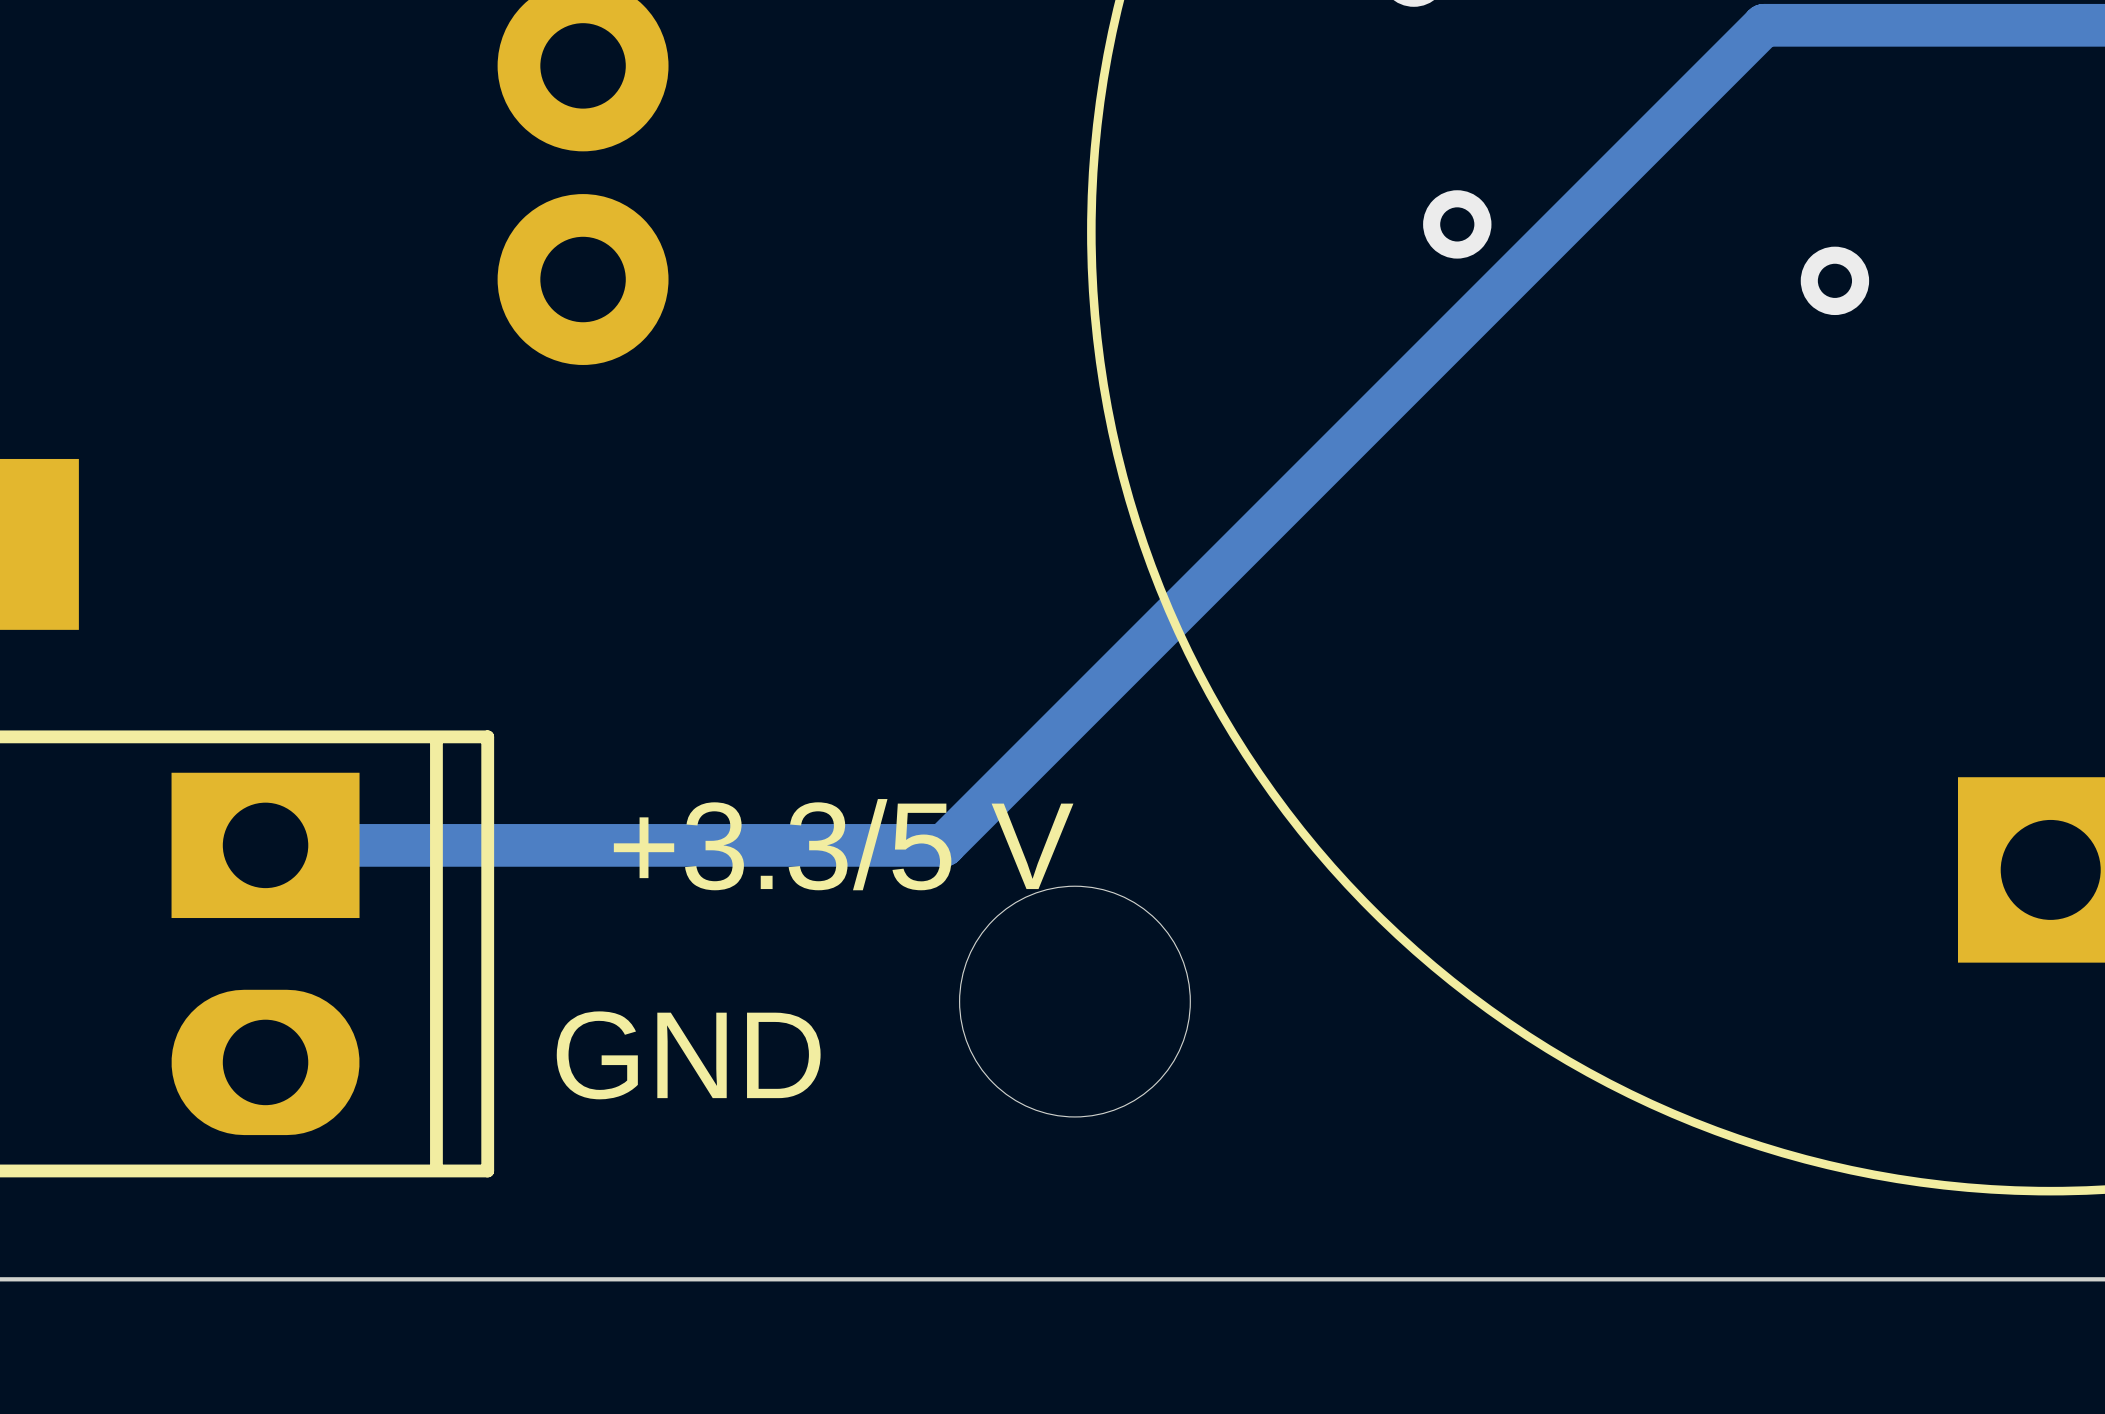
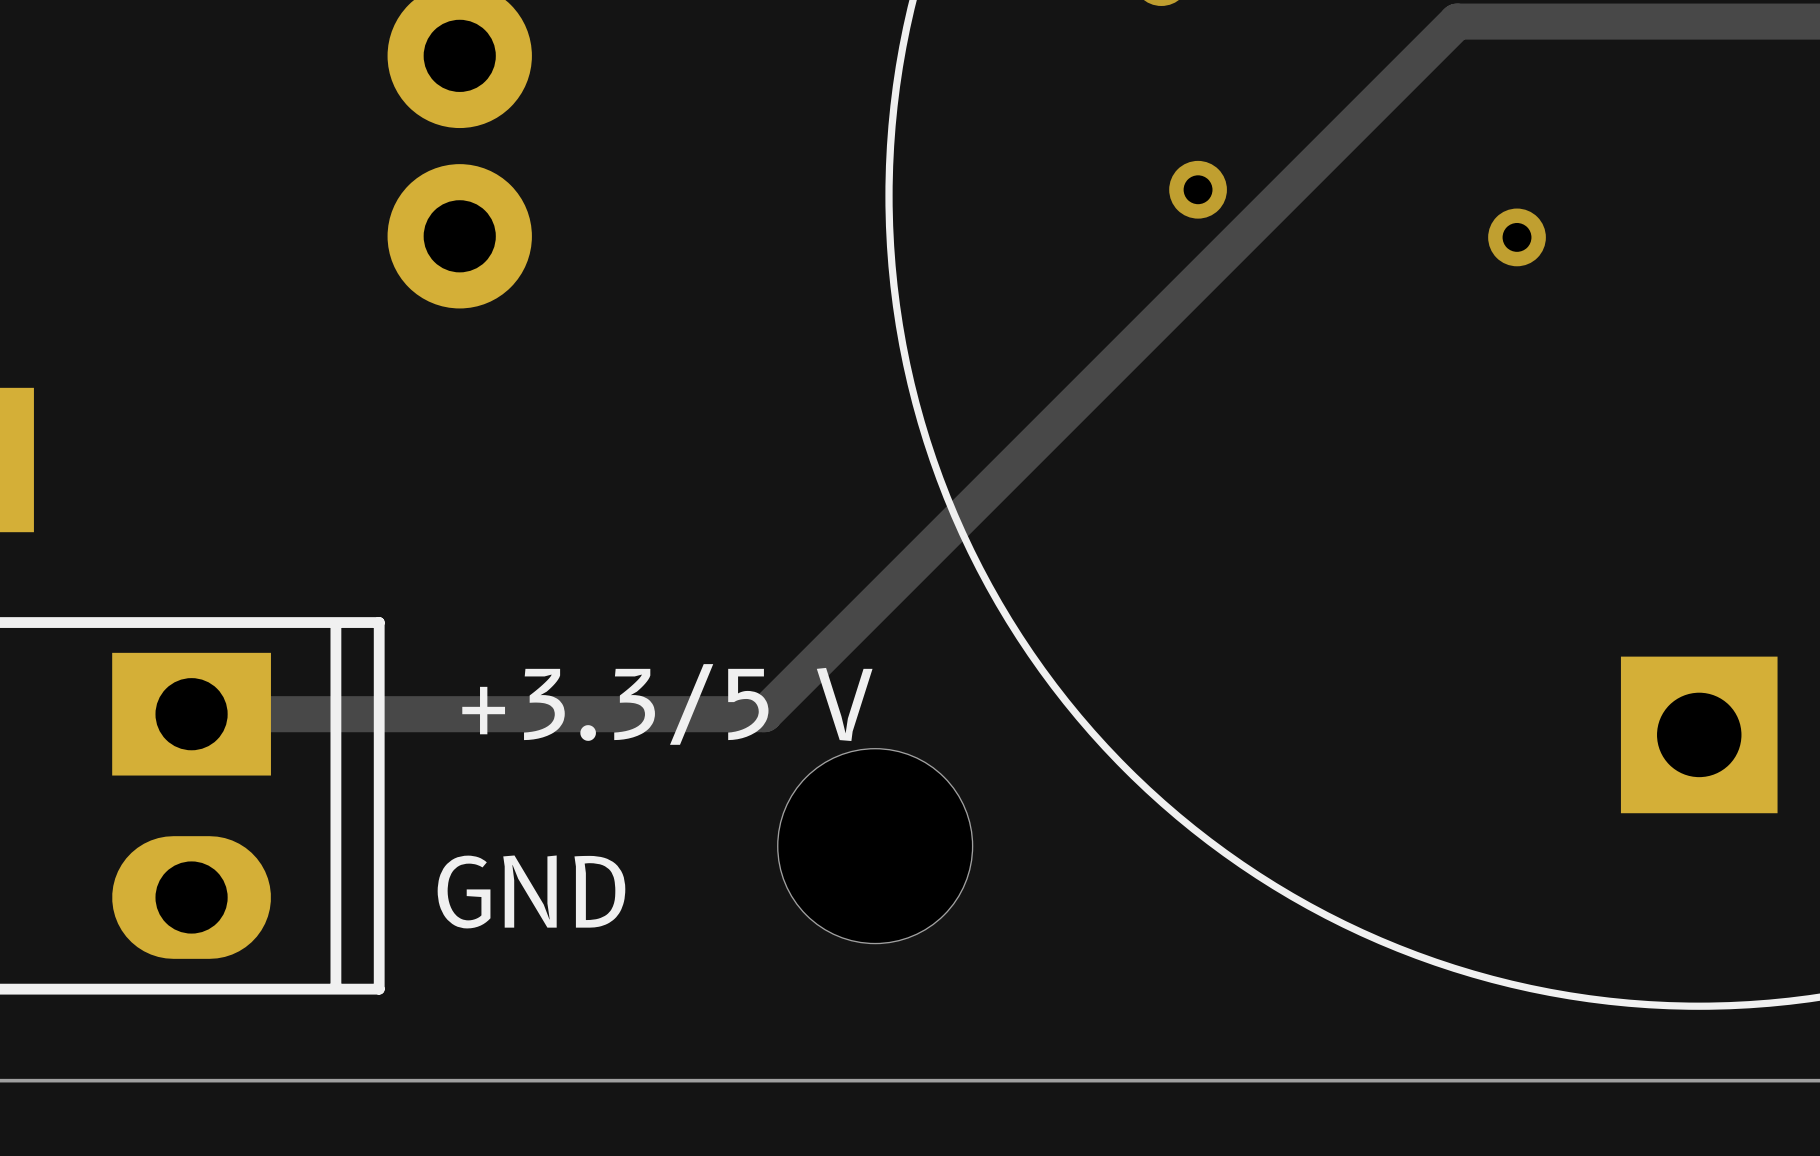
text position: +3.3/5 V (843, 844) -> +3.3/5 V (667, 704)
text position: GND (688, 1055) -> GND (531, 891)

